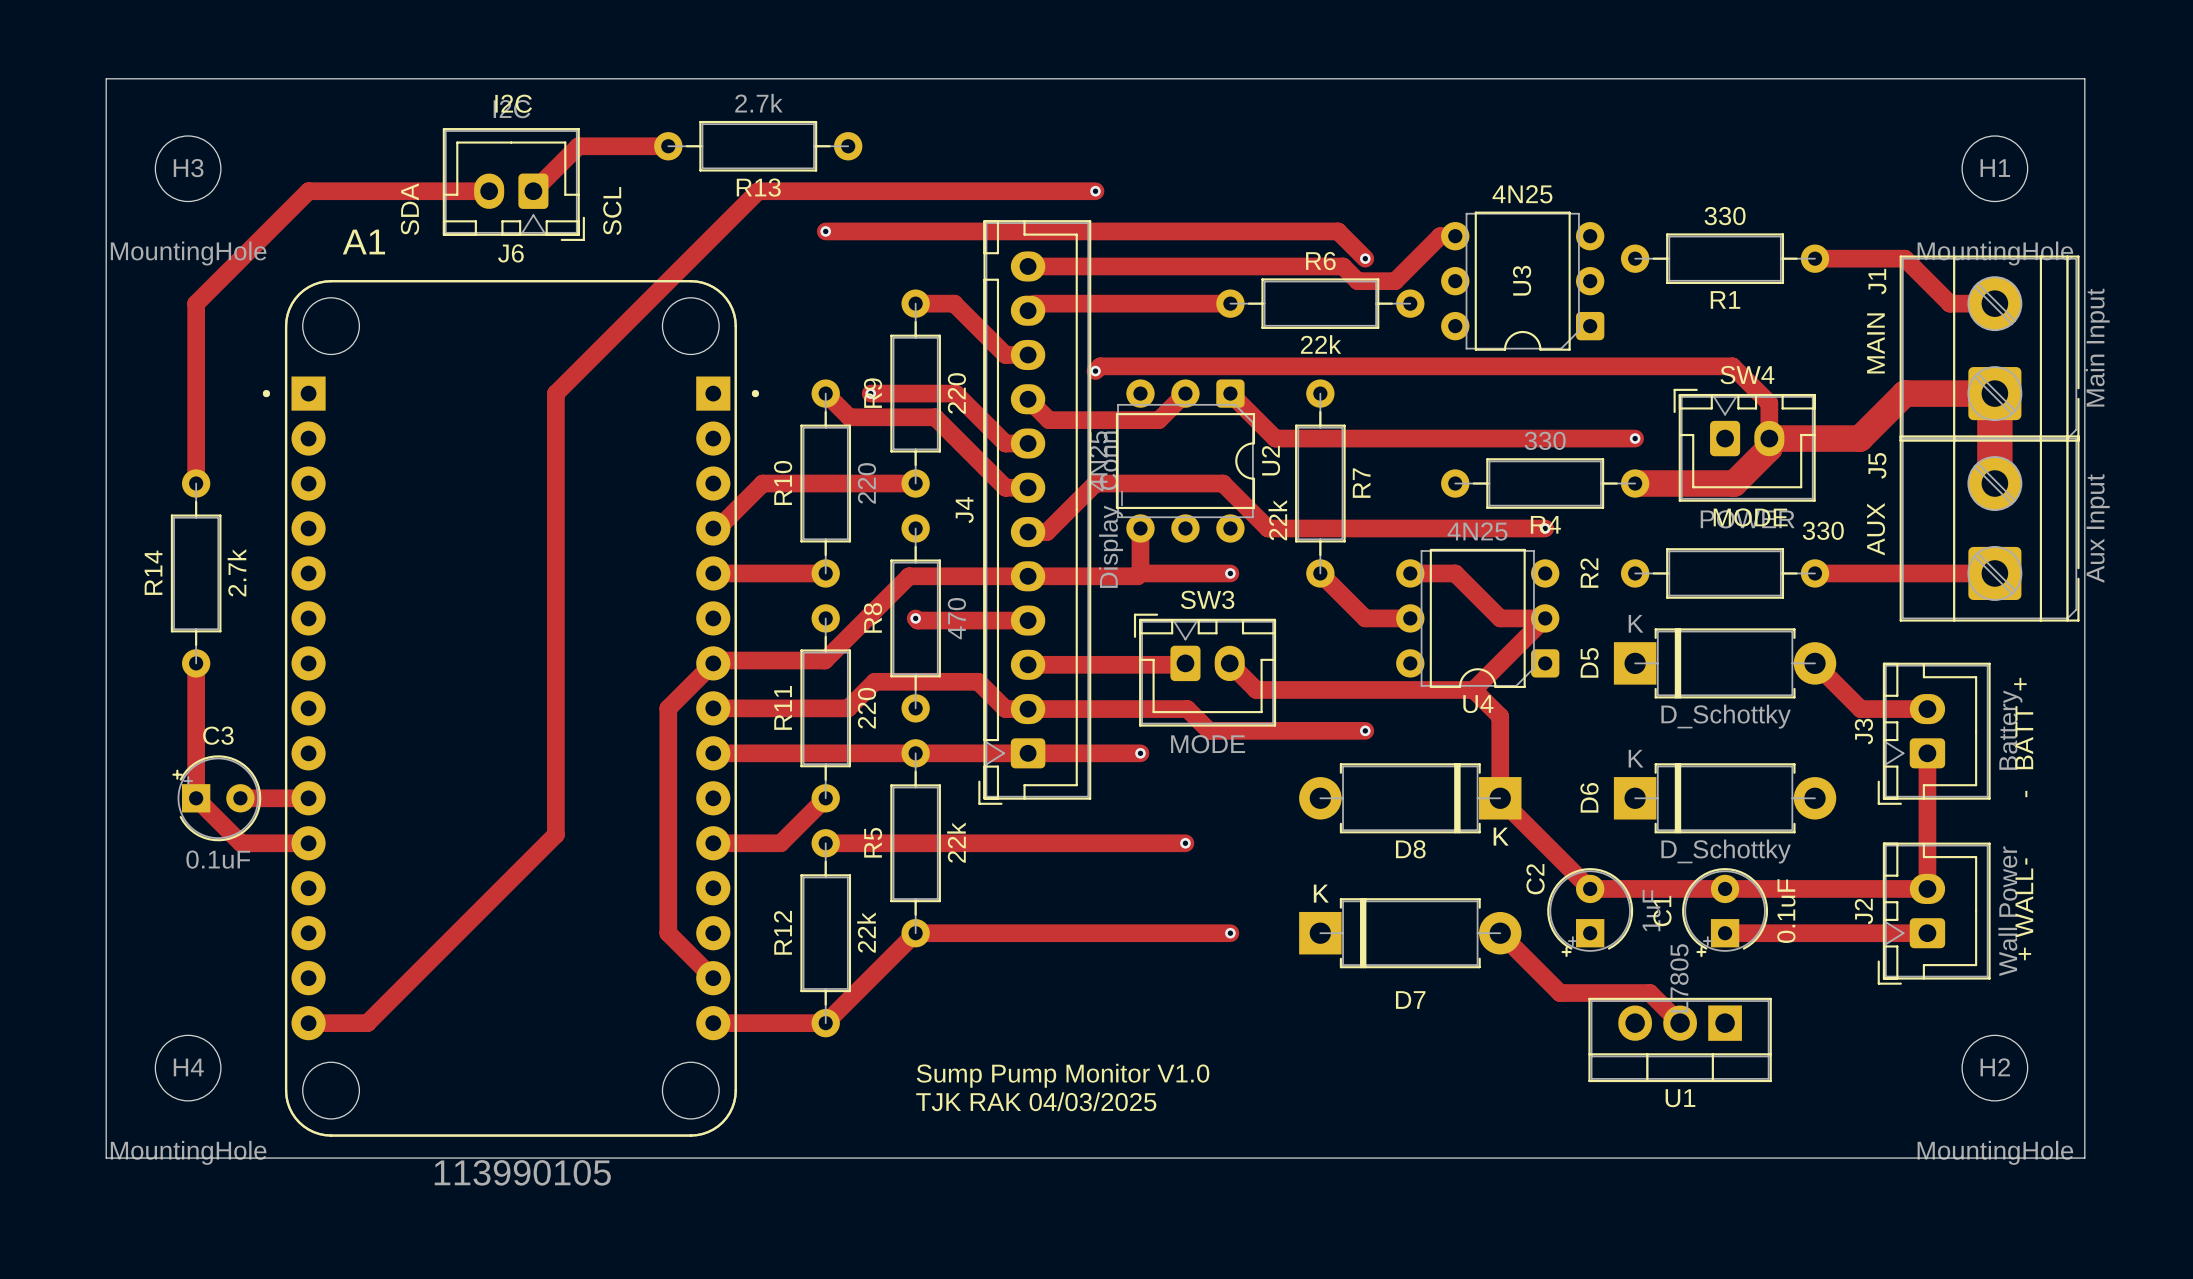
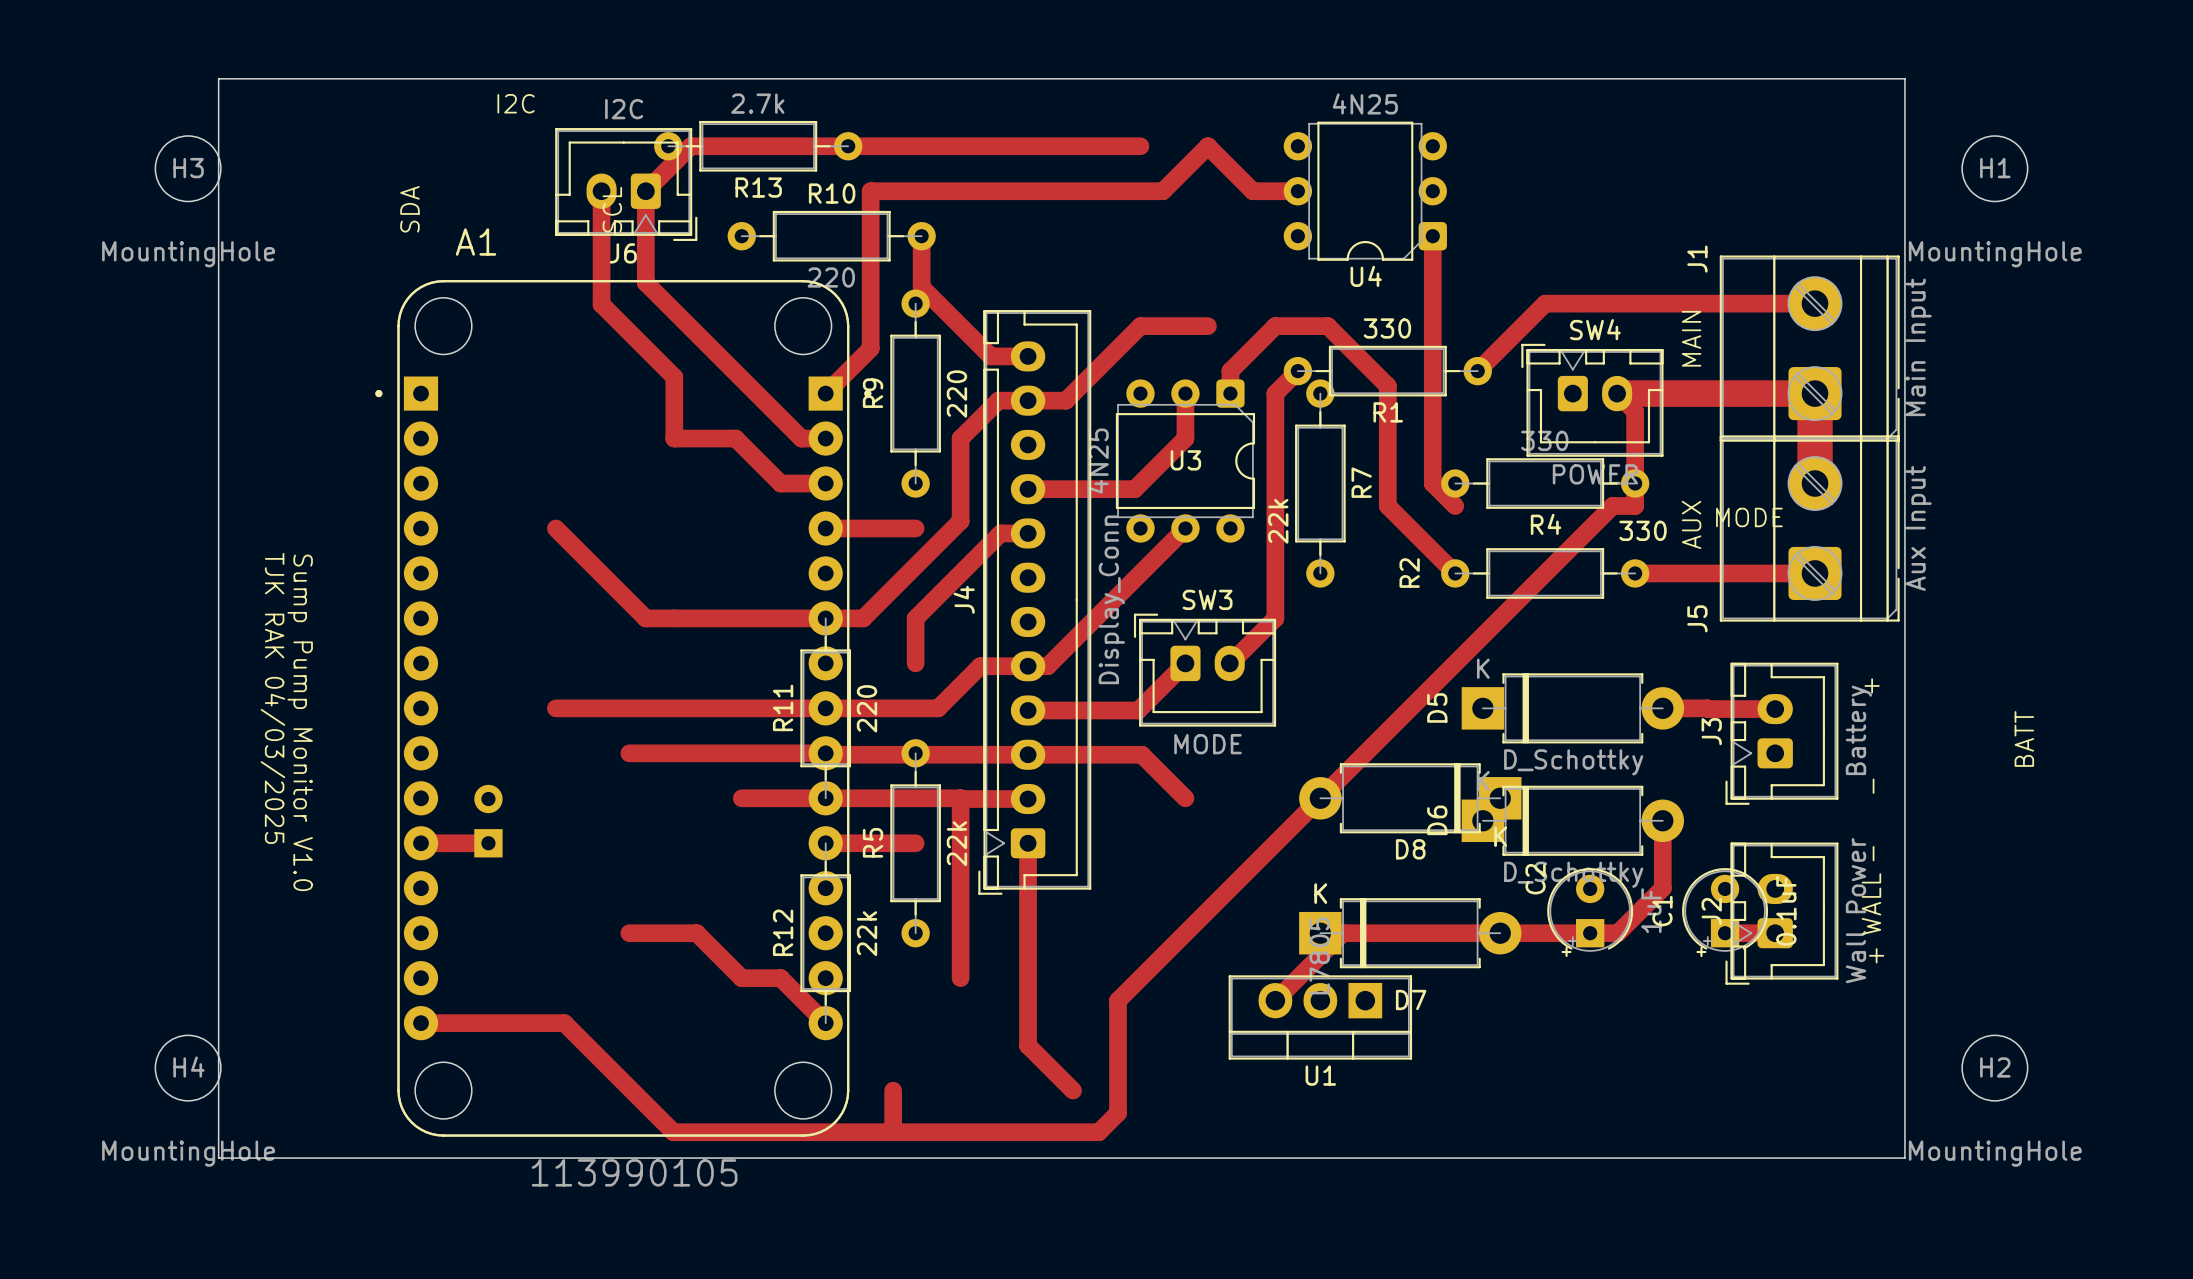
board edge: (218, 78) (106, 78) (106, 1158) (218, 1158) -> (218, 78) (218, 1158)
board edge: (1904, 78) (2084, 78) (2084, 1158) (1904, 1158) -> (1904, 78) (1904, 1158)
track: (668, 146) (578, 146) (533, 191) -> none
track: none -> (1140, 146) (690, 146) (645, 191) (645, 282) (801, 438) (825, 438)
J6 position: (513, 184) -> (626, 184)
track: (489, 191) (308, 191) (196, 303) (196, 483) -> none
track: (870, 191) (758, 191) (555, 393) (555, 834) (367, 1023) (308, 1023) -> none
track: none -> (1095, 191) (1162, 191) (1207, 146) (1252, 191) (1297, 191)
via: (1095, 191) -> none
track: (825, 231) (1338, 231) (1365, 258) -> none
via: (825, 231) -> none
track: none -> (921, 236) (921, 287) (990, 356) (1028, 356)
track: none -> (1432, 236) (1432, 483) (1455, 506)
track: (1455, 236) (1440, 236) (1395, 281) (1357, 281) (1343, 266) (1028, 266) -> none
via: (1365, 258) -> none
R1 position: (1725, 258) -> (1387, 371)
track: (1815, 258) (1904, 258) (1949, 303) (1994, 303) -> none
U3: 4N25 (1522, 281) -> none
J1 name position: J1 (1877, 281) -> J1 (1697, 259)
track: (915, 303) (954, 303) (1005, 354) (1028, 354) -> none
track: (1230, 303) (1035, 303) (1028, 310) -> none
R6: 22k (1320, 303) -> none
track: none -> (1815, 303) (1545, 303) (1477, 371)
text position: MAIN (1875, 343) -> MAIN (1691, 338)
J1 position: (1989, 348) -> (1809, 348)
track: (1100, 366) (1732, 366) (1769, 403) (1769, 438) -> (1100, 366) (1140, 326) (1207, 326)
track: none -> (1095, 371) (1065, 400) (998, 400) (960, 438) (960, 521) (863, 618) (645, 618) (555, 528)
via: (1095, 371) -> none
track: (825, 393) (849, 417) (935, 417) (1005, 487) (1028, 487) -> (825, 393) (870, 348) (870, 191)
track: (870, 393) (955, 393) (1005, 443) (1028, 443) -> none
via: (870, 393) -> none
track: (1185, 393) (1158, 420) (1048, 420) (1028, 399) -> (1185, 393) (1185, 438) (1134, 489) (1028, 489)
track: (1230, 393) (1275, 438) (1635, 438) -> (1230, 393) (1230, 371) (1275, 326) (1327, 326) (1387, 386) (1387, 506) (1455, 573)
via: (1635, 438) -> none
track: (1769, 438) (1859, 438) (1904, 393) (1994, 393) (1994, 483) -> none
track: (1769, 438) (1769, 448) (1734, 483) (1635, 483) -> none
SW4 position: (1744, 445) -> (1592, 400)
U2 name: U2 (1271, 460) -> U3 (1185, 460)
J5 name position: J5 (1877, 465) -> J5 (1697, 618)
track: (780, 483) (762, 483) (717, 528) (713, 528) -> (780, 483) (735, 438) (674, 438) (674, 377) (601, 304) (601, 191)
track: (825, 483) (915, 483) -> (825, 528) (915, 528)
R10 rotation: 0° (825, 483) -> 90° clockwise (831, 236)
R10 position: (825, 483) -> (831, 236)
track: none -> (1815, 483) (1815, 393) (1617, 393) (1635, 411) (1635, 506) (1612, 506) (1118, 1000) (1118, 1113) (1098, 1132) (673, 1132) (564, 1023) (420, 1023)
J4 position: (1034, 512) -> (1034, 602)
track: (1140, 528) (1140, 573) (1230, 573) -> none
track: none -> (1185, 528) (1140, 573)
track: (1545, 528) (1268, 528) (1223, 483) (1095, 483) (1047, 532) (1028, 532) -> none
via: (1545, 528) -> none
J5 position: (1989, 528) -> (1809, 528)
text position: AUX (1876, 529) -> AUX (1691, 524)
track: none -> (1028, 533) (1000, 533) (915, 618) (915, 663)
R14: 2.7k (196, 573) -> none
track: (713, 573) (825, 573) -> none
via: (1230, 573) -> none
track: (1320, 573) (1365, 618) (1410, 618) -> none
track: (1410, 573) (1455, 573) (1500, 618) (1545, 618) (1473, 689) -> none
R2 position: (1725, 573) -> (1545, 573)
track: (1815, 573) (1994, 573) -> (1815, 573) (1635, 573)
track: (1137, 576) (909, 576) (824, 660) (716, 660) (668, 708) (668, 933) (713, 978) -> none
track: (915, 618) (917, 620) (1028, 620) -> none
R8: 470 (915, 618) -> none
via: (915, 618) -> none
U4 position: (1477, 618) -> (1365, 191)
track: (196, 663) (196, 798) (241, 843) (308, 843) -> none
track: (1229, 663) (1256, 689) (1473, 689) -> (1230, 663) (1275, 618) (1275, 393) (1297, 371)
D5 position: (1725, 663) -> (1572, 708)
track: (1815, 663) (1860, 709) (1927, 709) -> none
track: (1028, 664) (1184, 664) -> (1028, 710) (1138, 710) (1184, 664)
text: none -> TJK RAK 04/03/2025 (272, 698)
text position: + (2020, 684) -> + (1872, 685)
track: (1473, 689) (1500, 716) (1500, 799) (1590, 888) (1927, 888) (1927, 753) -> none
text: none -> Sump Pump Monitor V1.0 (300, 722)
A1 position: (510, 708) -> (623, 708)
track: none -> (555, 708) (713, 708)
track: (848, 708) (874, 681) (978, 681) (1005, 709) (1187, 709) (1209, 730) (1365, 730) -> (848, 708) (938, 708) (980, 666) (1047, 666) (1137, 576)
track: none -> (1662, 708) (1775, 709)
via: (1365, 730) -> none
J3 position: (1934, 733) -> (1781, 733)
track: none -> (629, 753) (713, 753)
track: (825, 753) (1140, 753) -> (825, 753) (1141, 754) (1185, 798)
via: (1140, 753) -> none
text: none -> - (1873, 786)
text: - (2026, 794) -> none
C3 side: top (216, 798) -> bottom (488, 821)
track: (240, 798) (308, 798) -> none
track: none -> (741, 798) (960, 798)
track: (825, 798) (780, 843) (713, 843) -> none
track: none -> (960, 798) (960, 978)
track: none -> (960, 798) (1028, 799)
D6 position: (1725, 798) -> (1572, 820)
track: none -> (1662, 820) (1662, 888) (1617, 933) (1342, 933) (1275, 1000)
track: none -> (420, 843) (488, 843)
track: (915, 843) (1185, 843) -> none
track: none -> (1028, 843) (1028, 1045) (1073, 1090)
via: (1185, 843) -> none
text: none -> - (1873, 853)
text: - (2026, 861) -> none
text position: WALL (2024, 903) -> WALL (1871, 904)
J2 position: (1934, 913) -> (1781, 913)
track: none -> (629, 933) (696, 933) (741, 978) (780, 978) (825, 1023)
track: (1230, 933) (915, 933) (825, 1023) (713, 1023) -> none
via: (1230, 933) -> none
track: (1500, 933) (1560, 993) (1649, 993) (1680, 1023) (1680, 1026) -> none
track: (1775, 933) (1927, 933) -> none
text position: + (2024, 953) -> + (1876, 955)
U1 position: (1680, 1039) -> (1320, 1017)
text: Sump Pump Monitor V1.0 (1063, 1075) -> none
track: none -> (893, 1090) (893, 1132)
text: TJK RAK 04/03/2025 (1036, 1101) -> none

